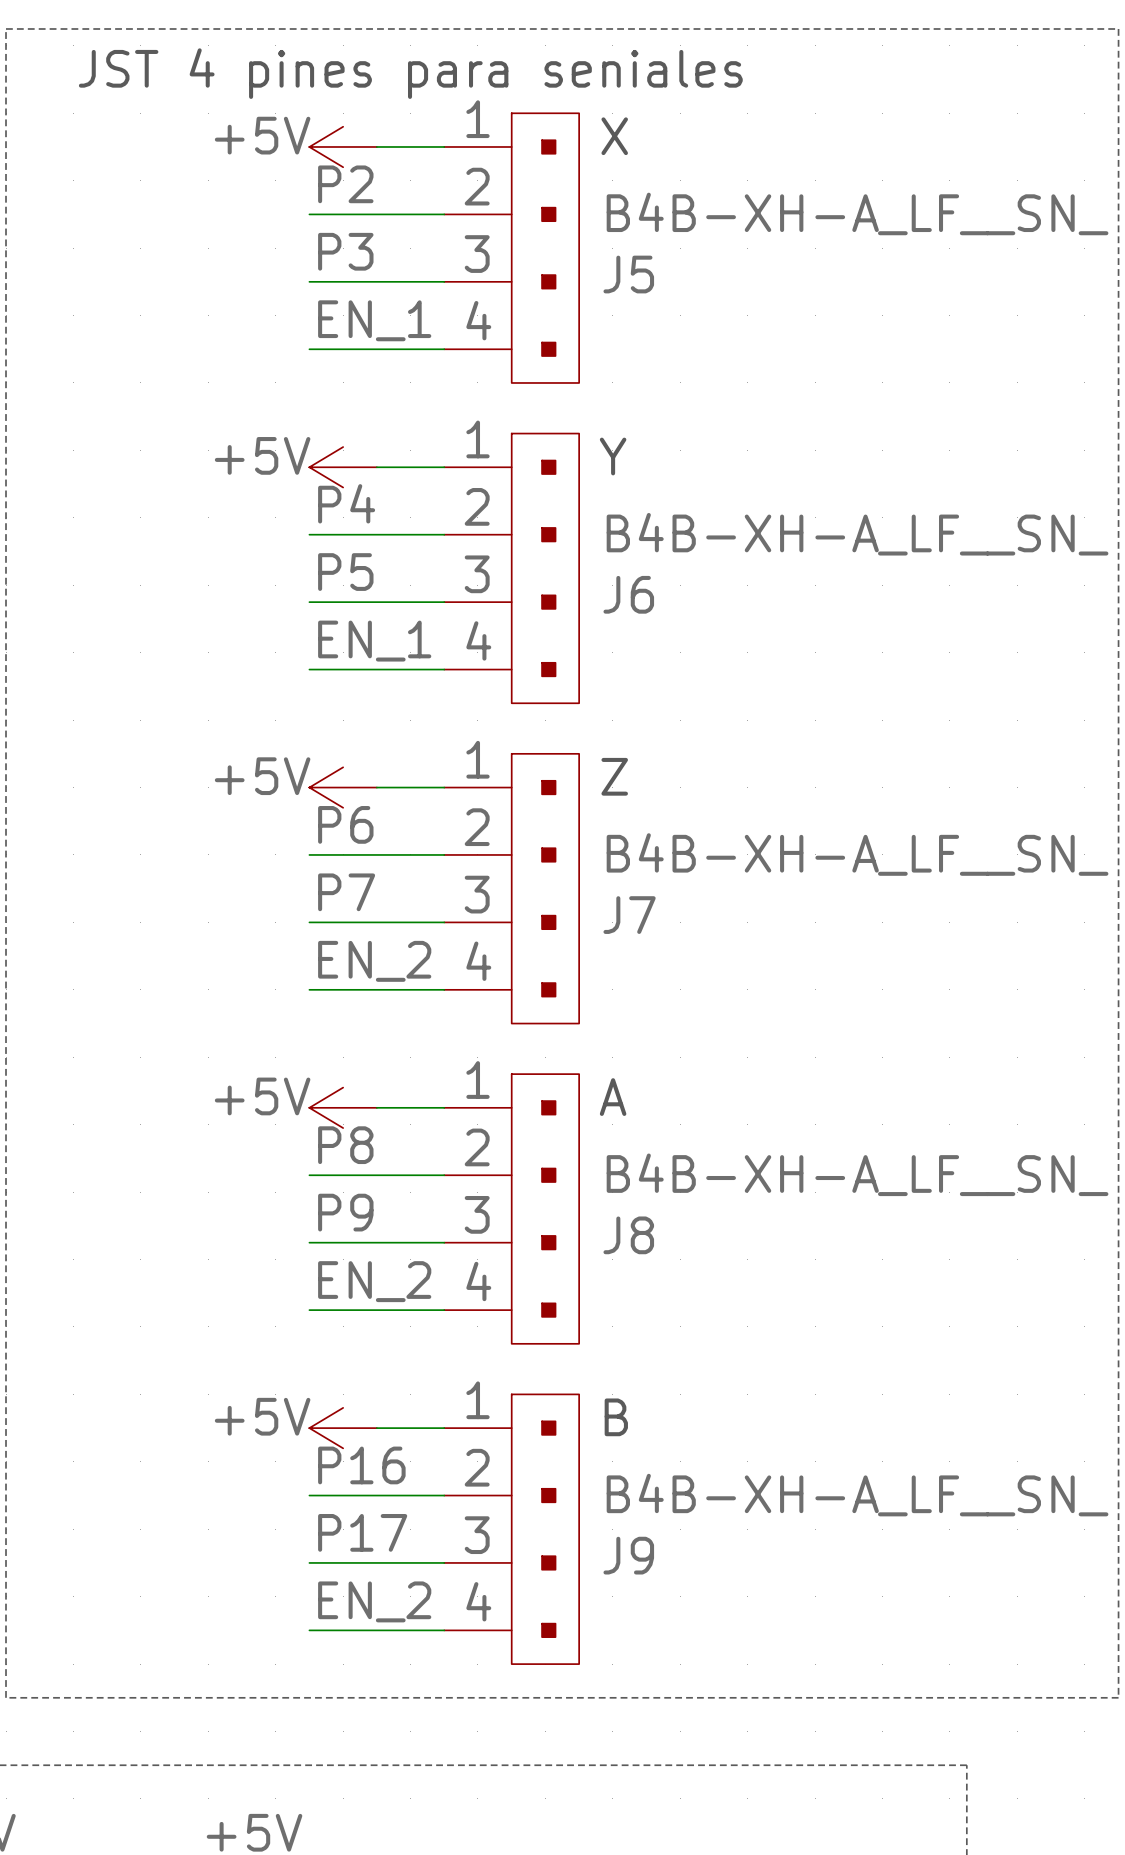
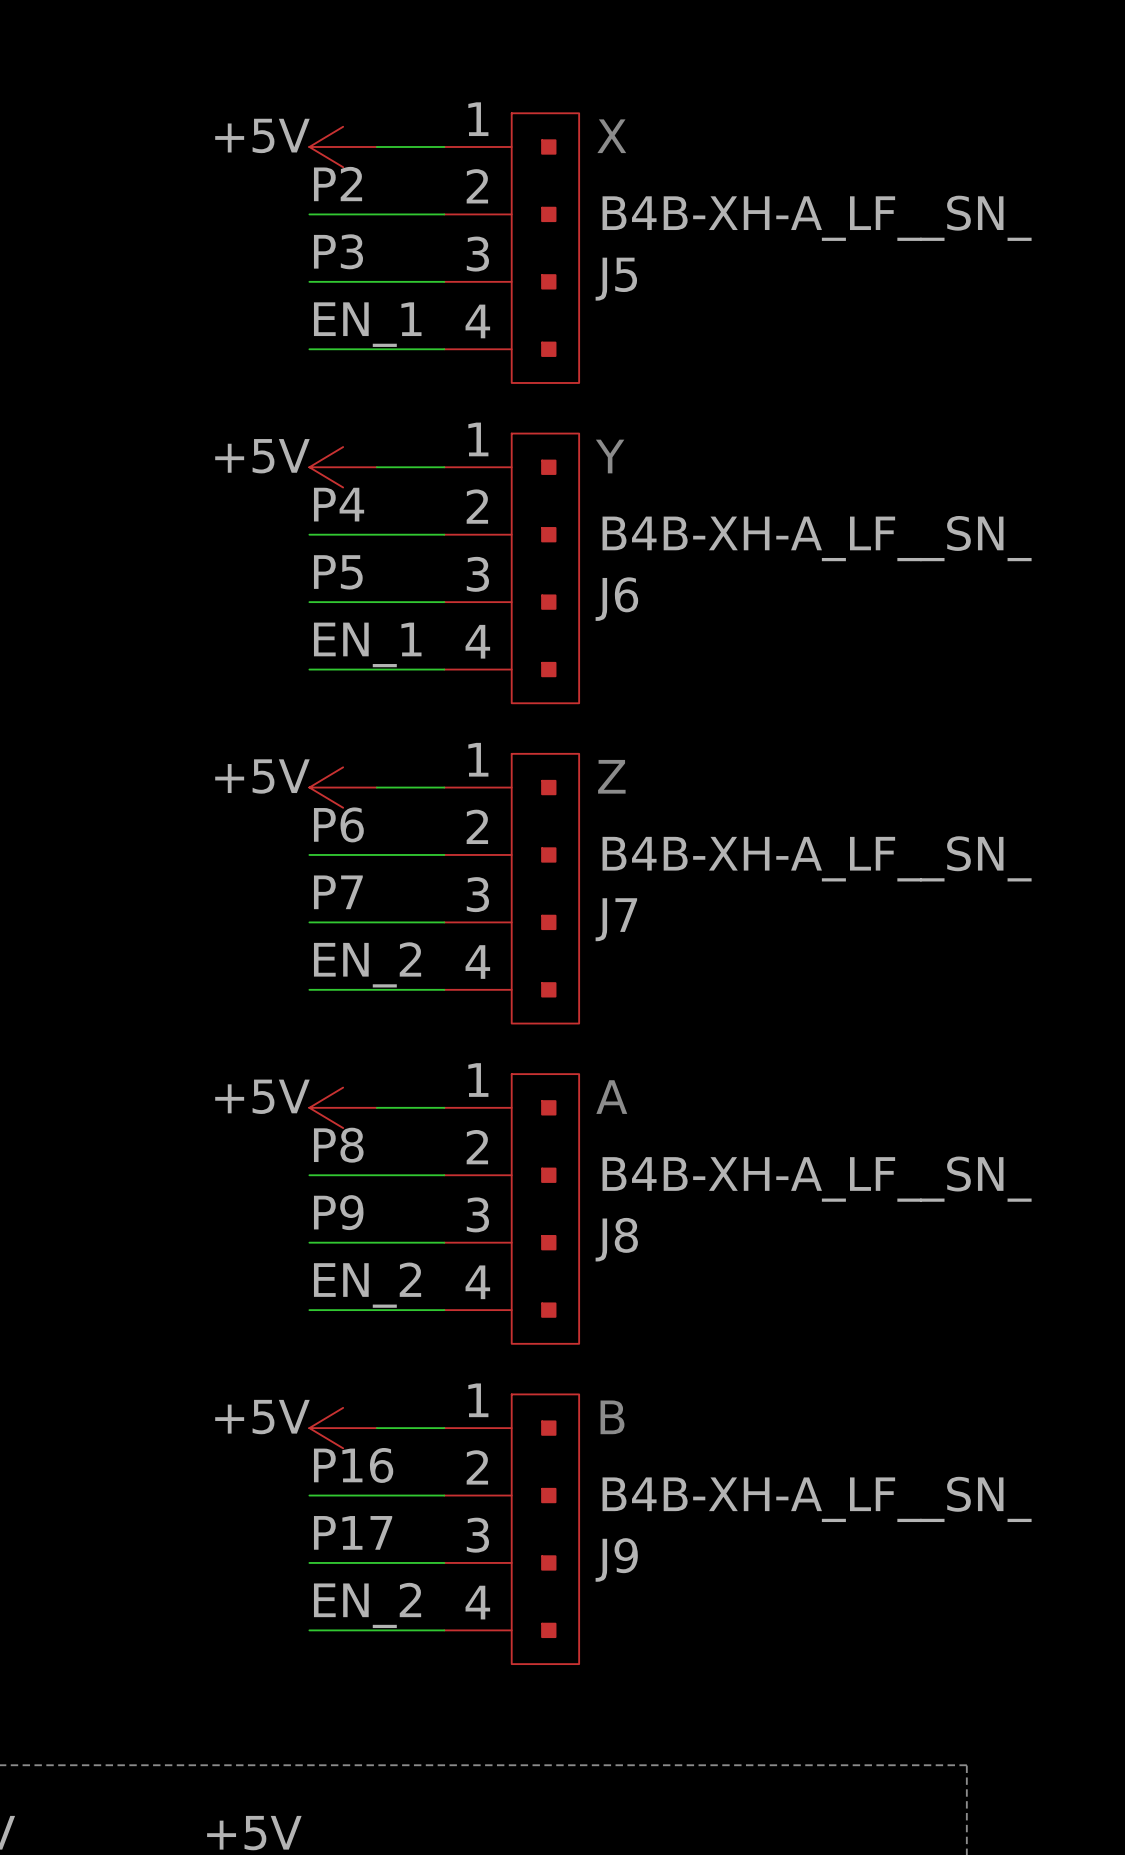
line: (6, 28) (1118, 28) (1118, 1697) (6, 1697) (6, 28) -> none
text: JST 4 pines para seniales (410, 73) -> none

